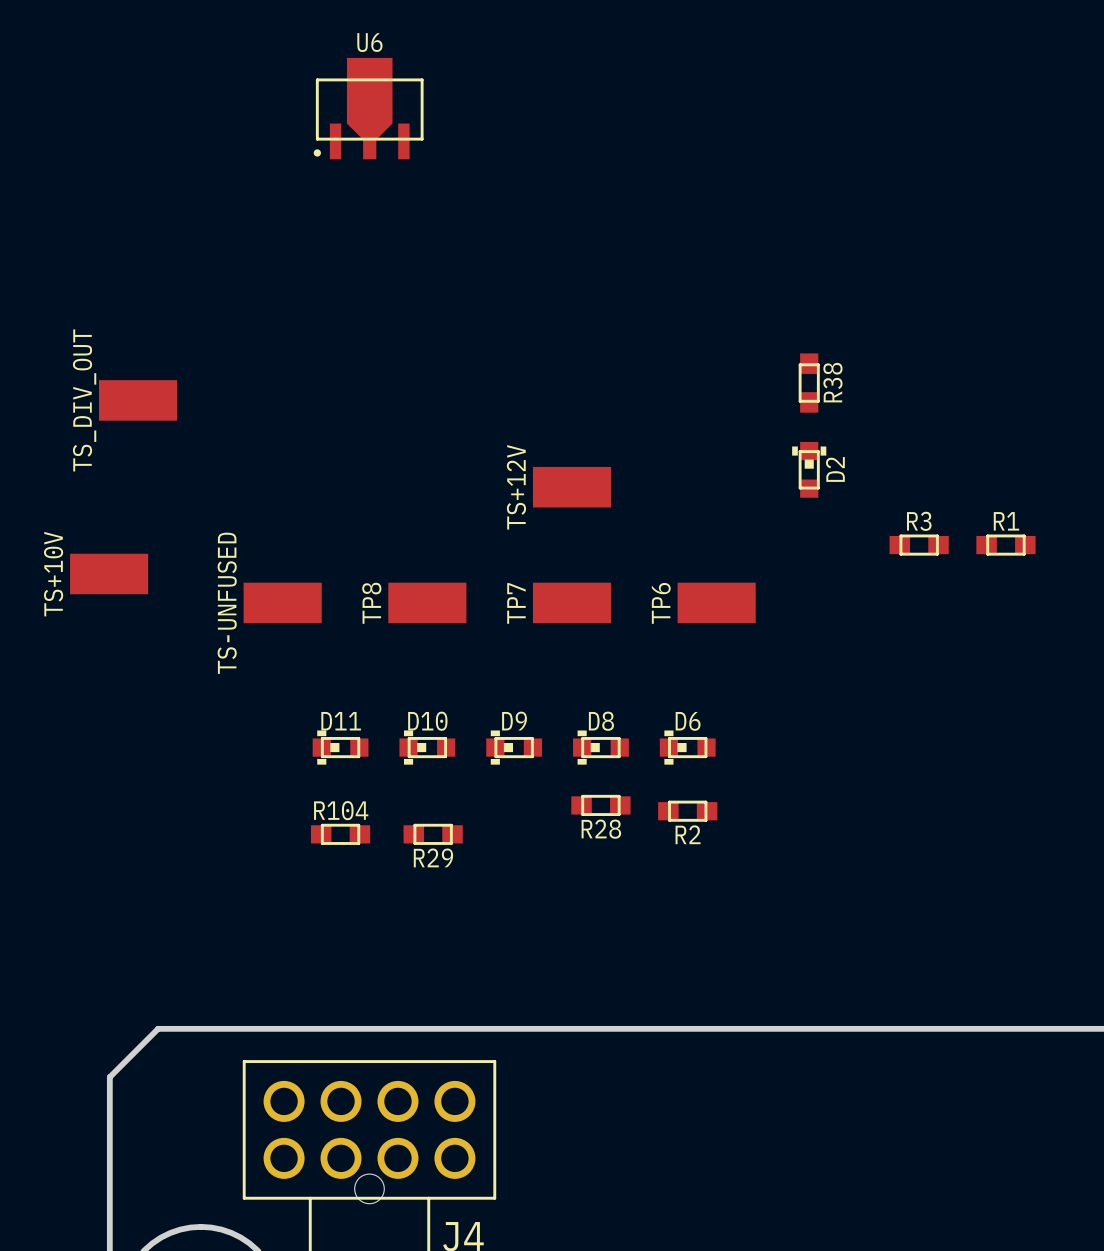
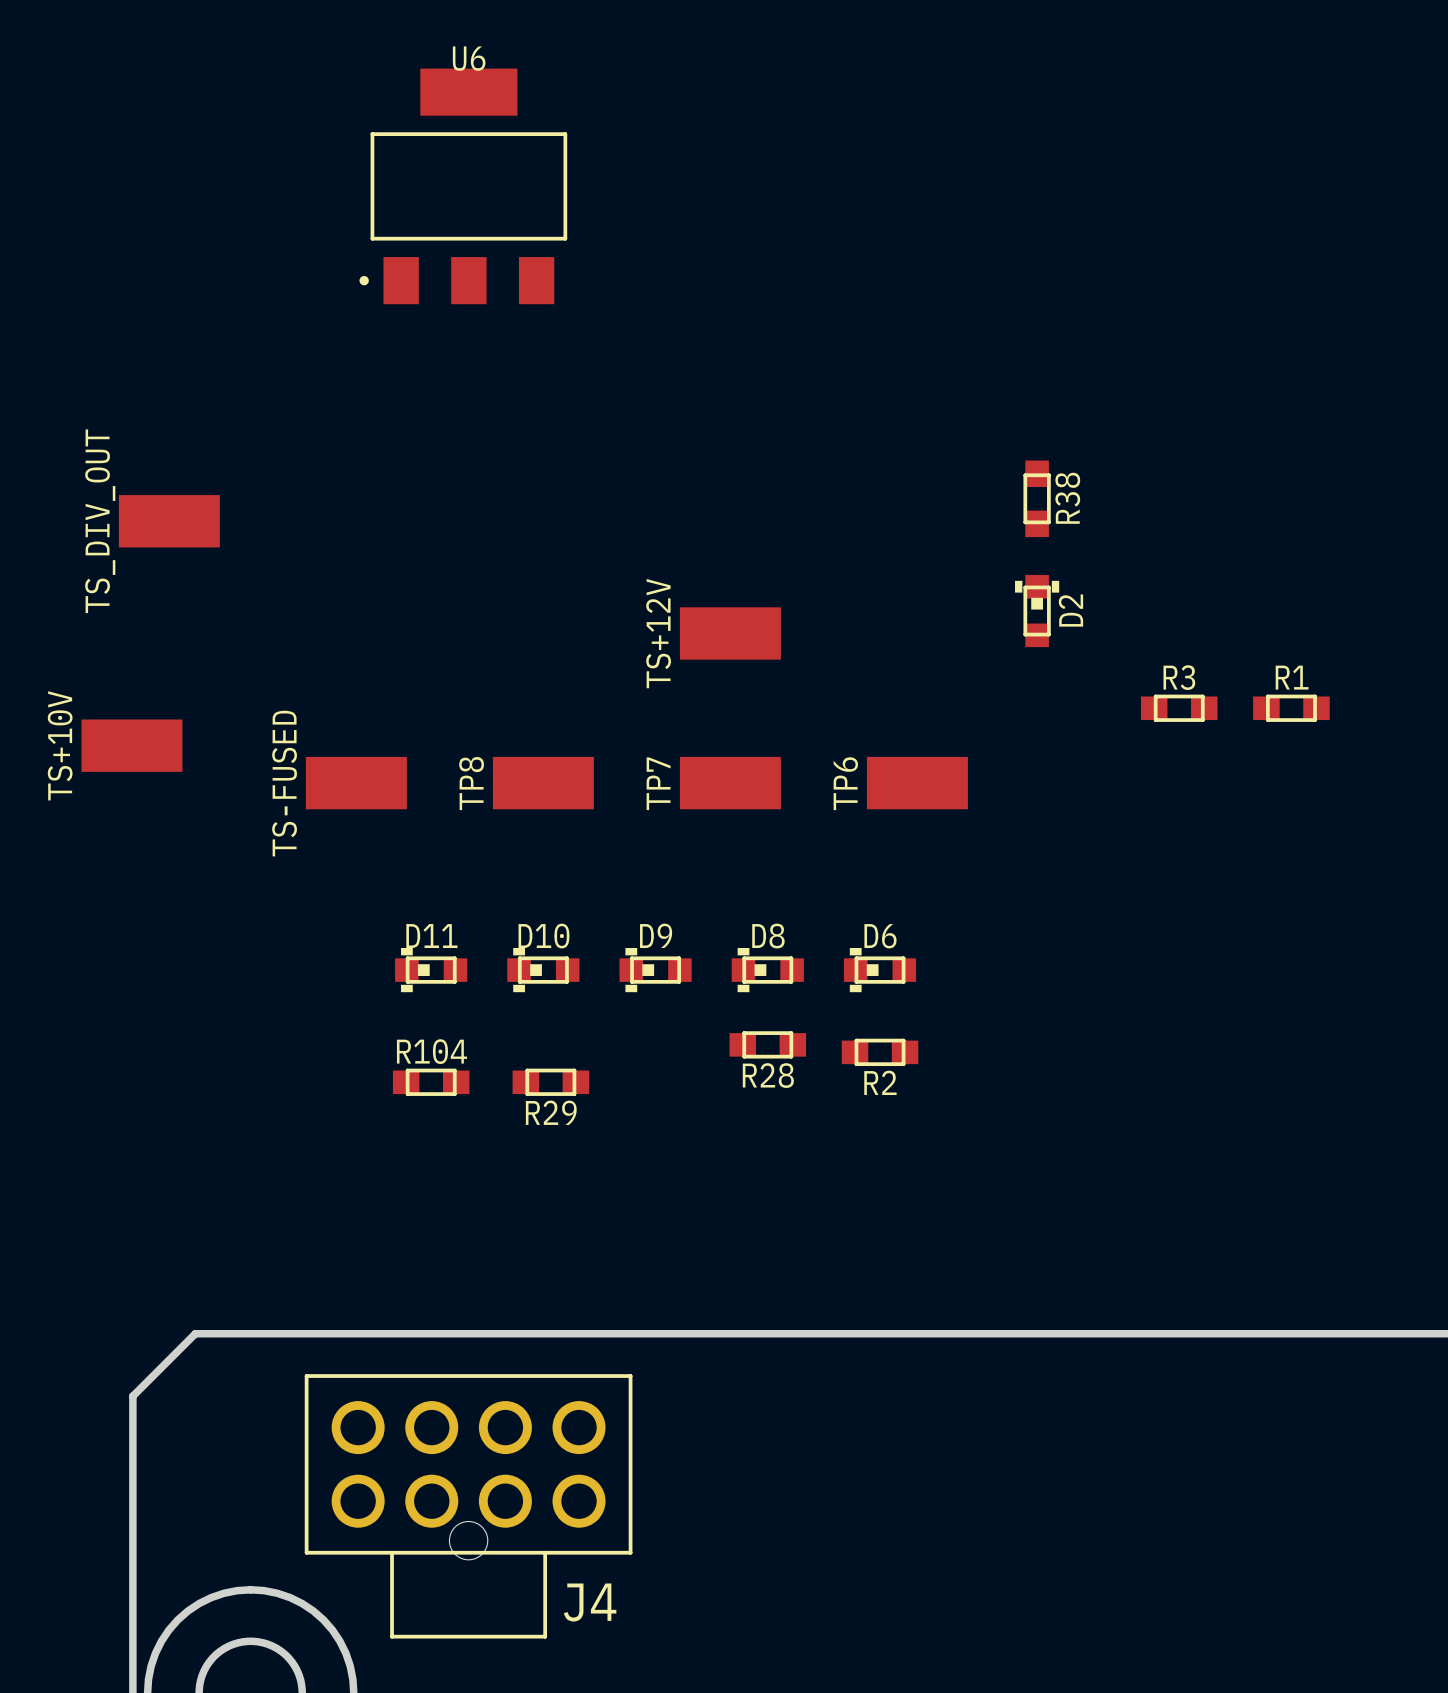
U6 footprint: [313, 57, 424, 160] -> [359, 68, 568, 305]
TS-UNFUSED name: TS-UNFUSED (227, 603) -> TS-FUSED (284, 783)

